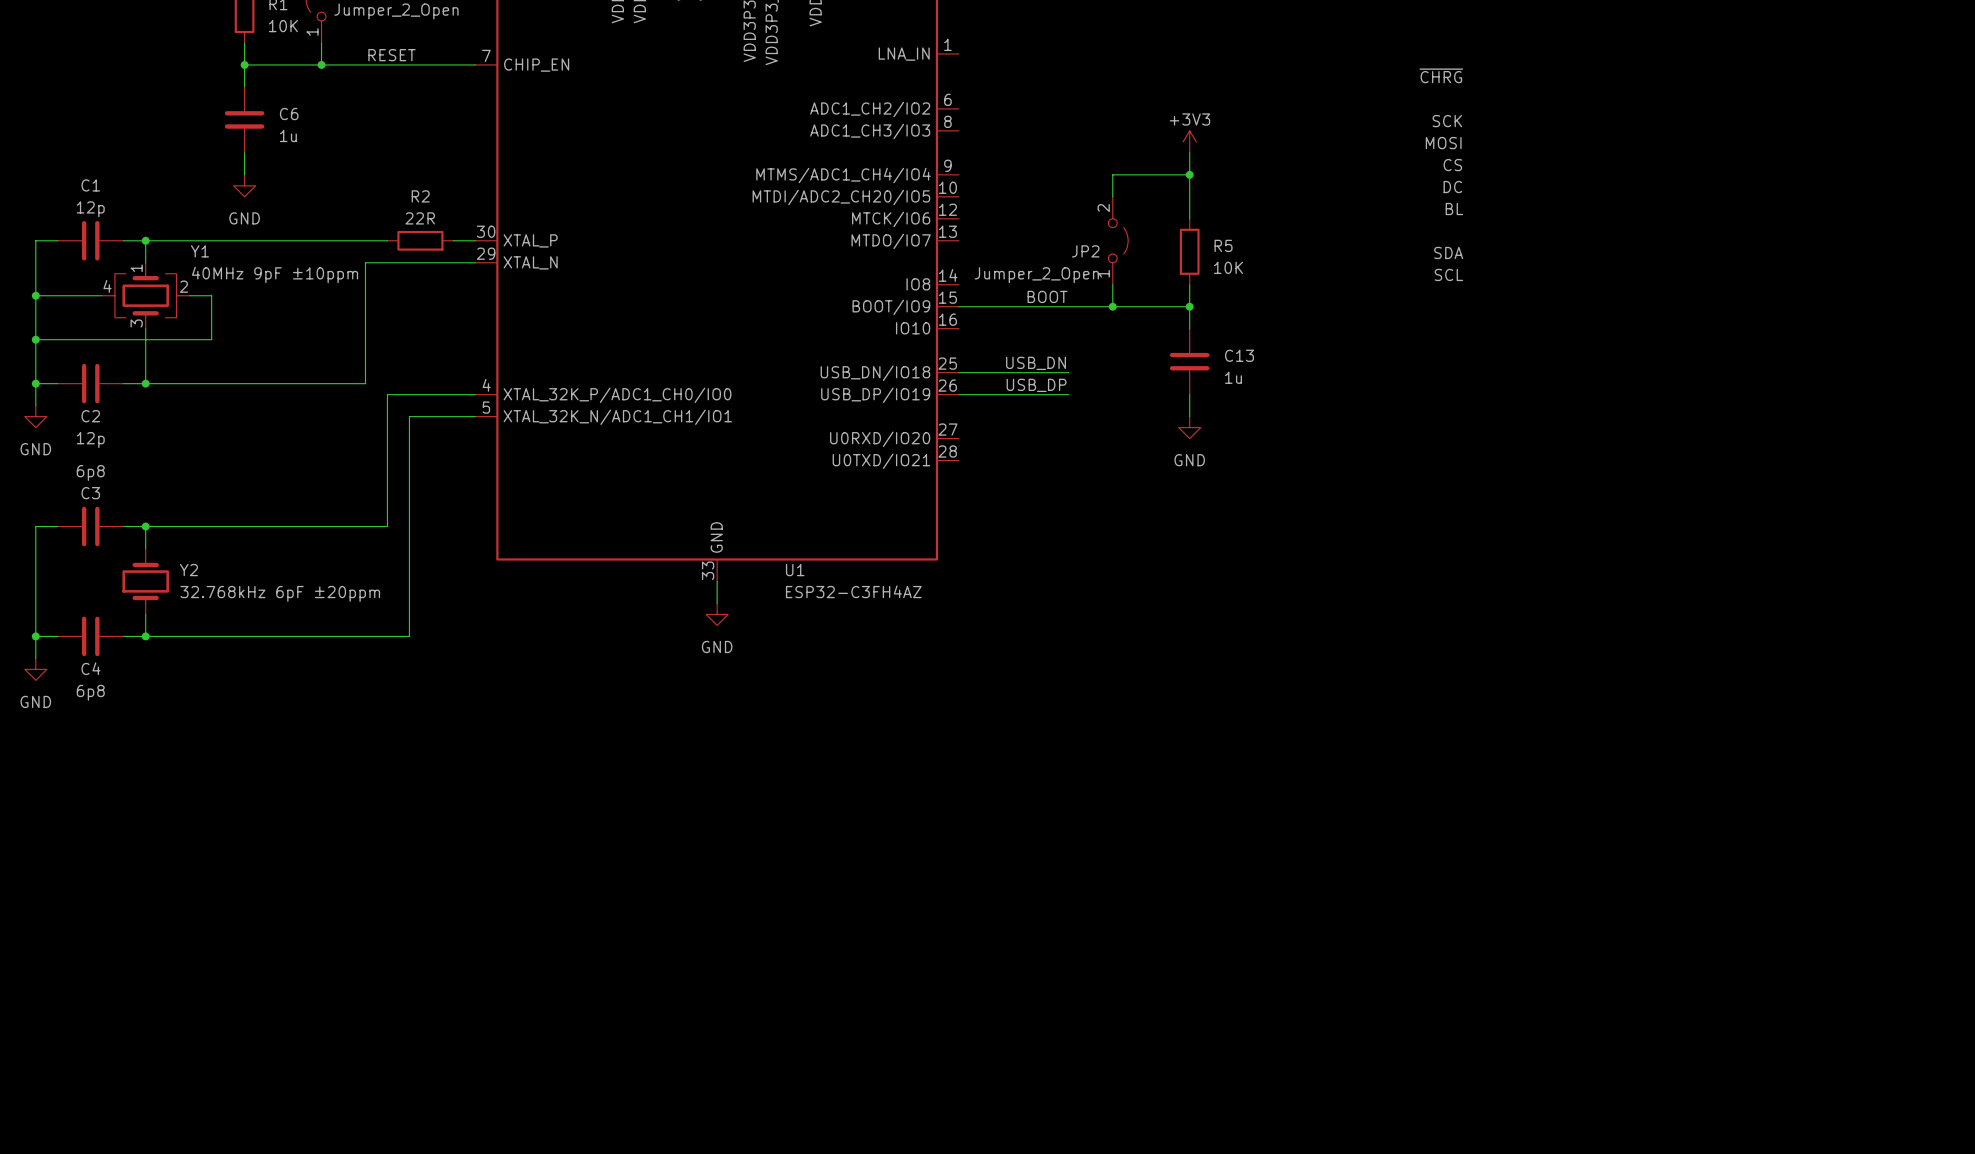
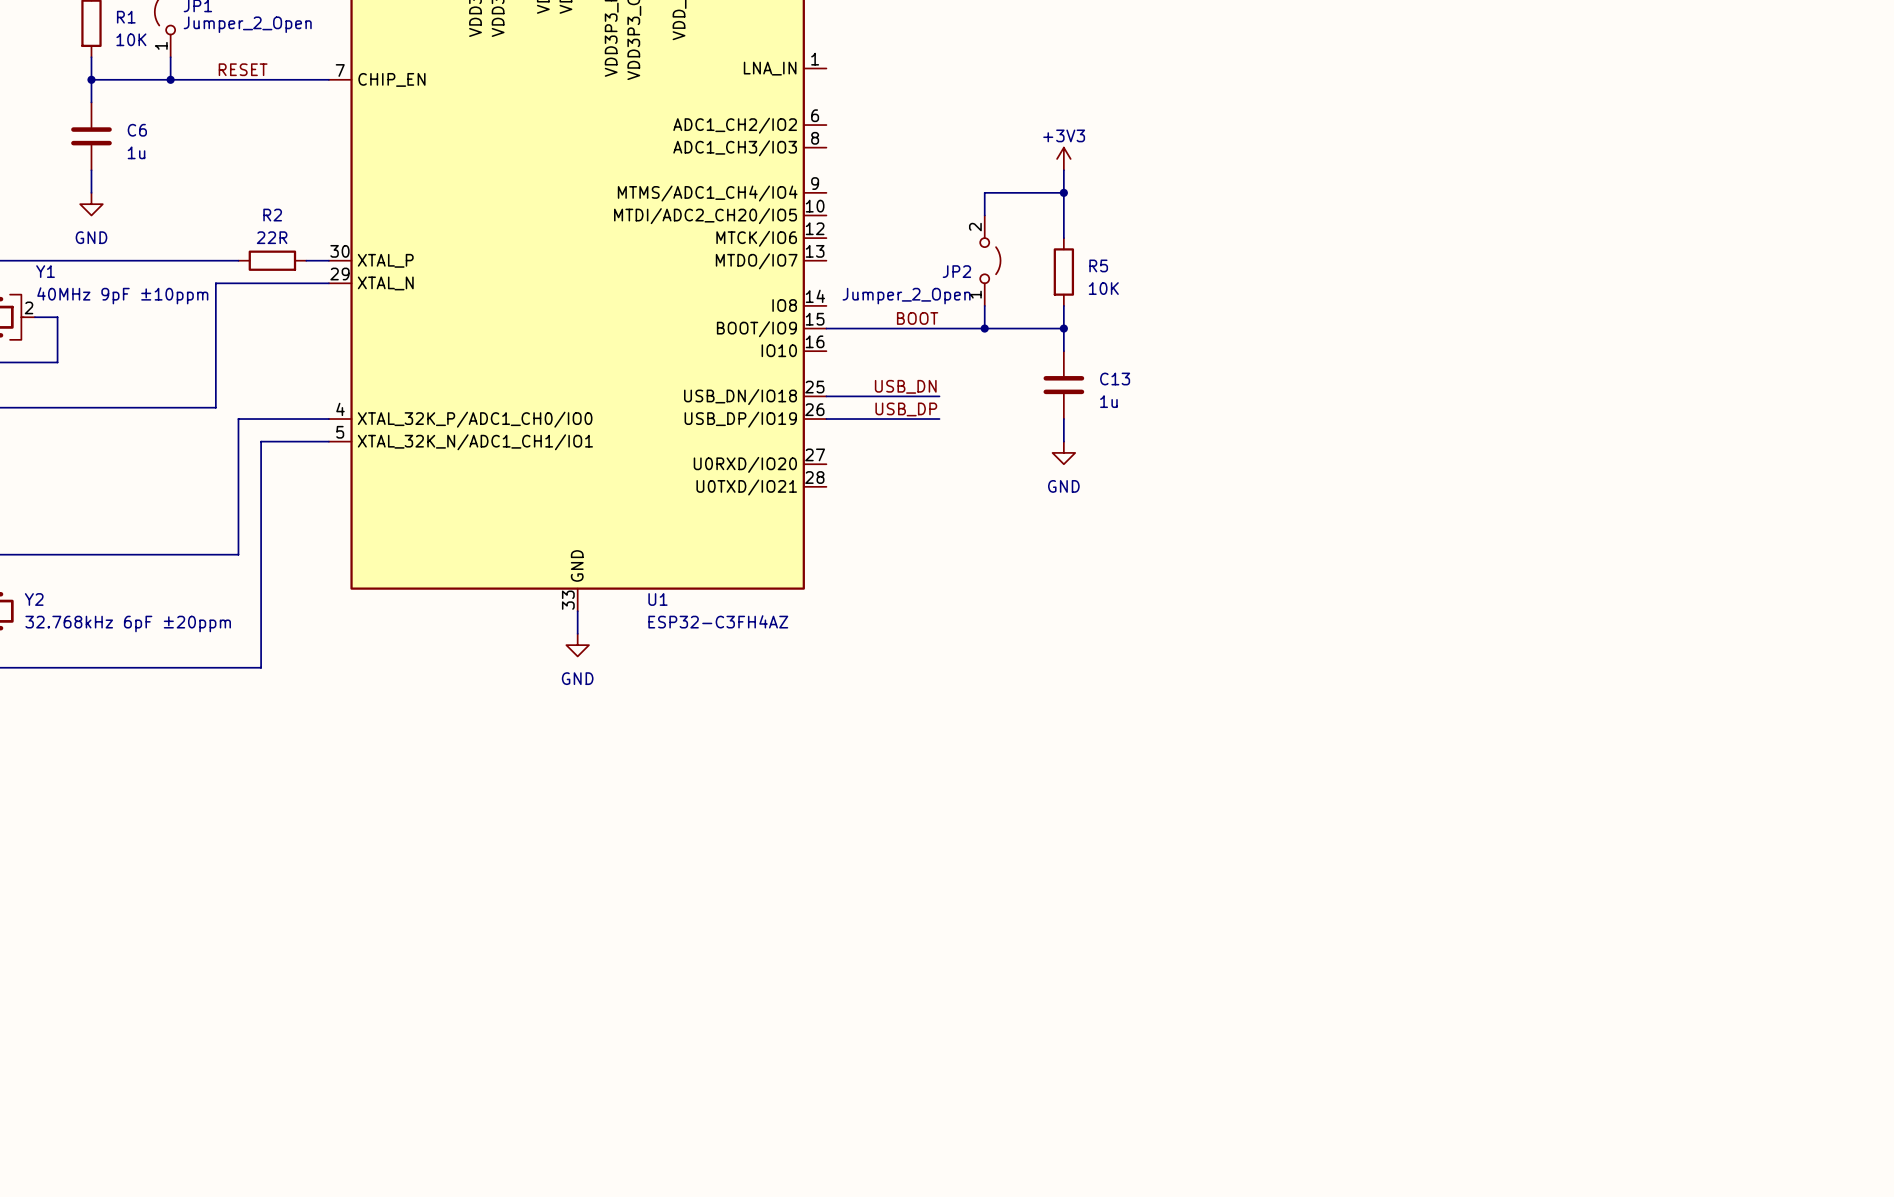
label: ~{CHRG} (1441, 75) -> none
label: SCK (1447, 121) -> none
label: MOSI (1443, 143) -> none
label: CS (1452, 165) -> none
label: DC (1452, 187) -> none
label: BL (1454, 209) -> none
label: SDA (1448, 252) -> none
label: SCL (1448, 274) -> none

